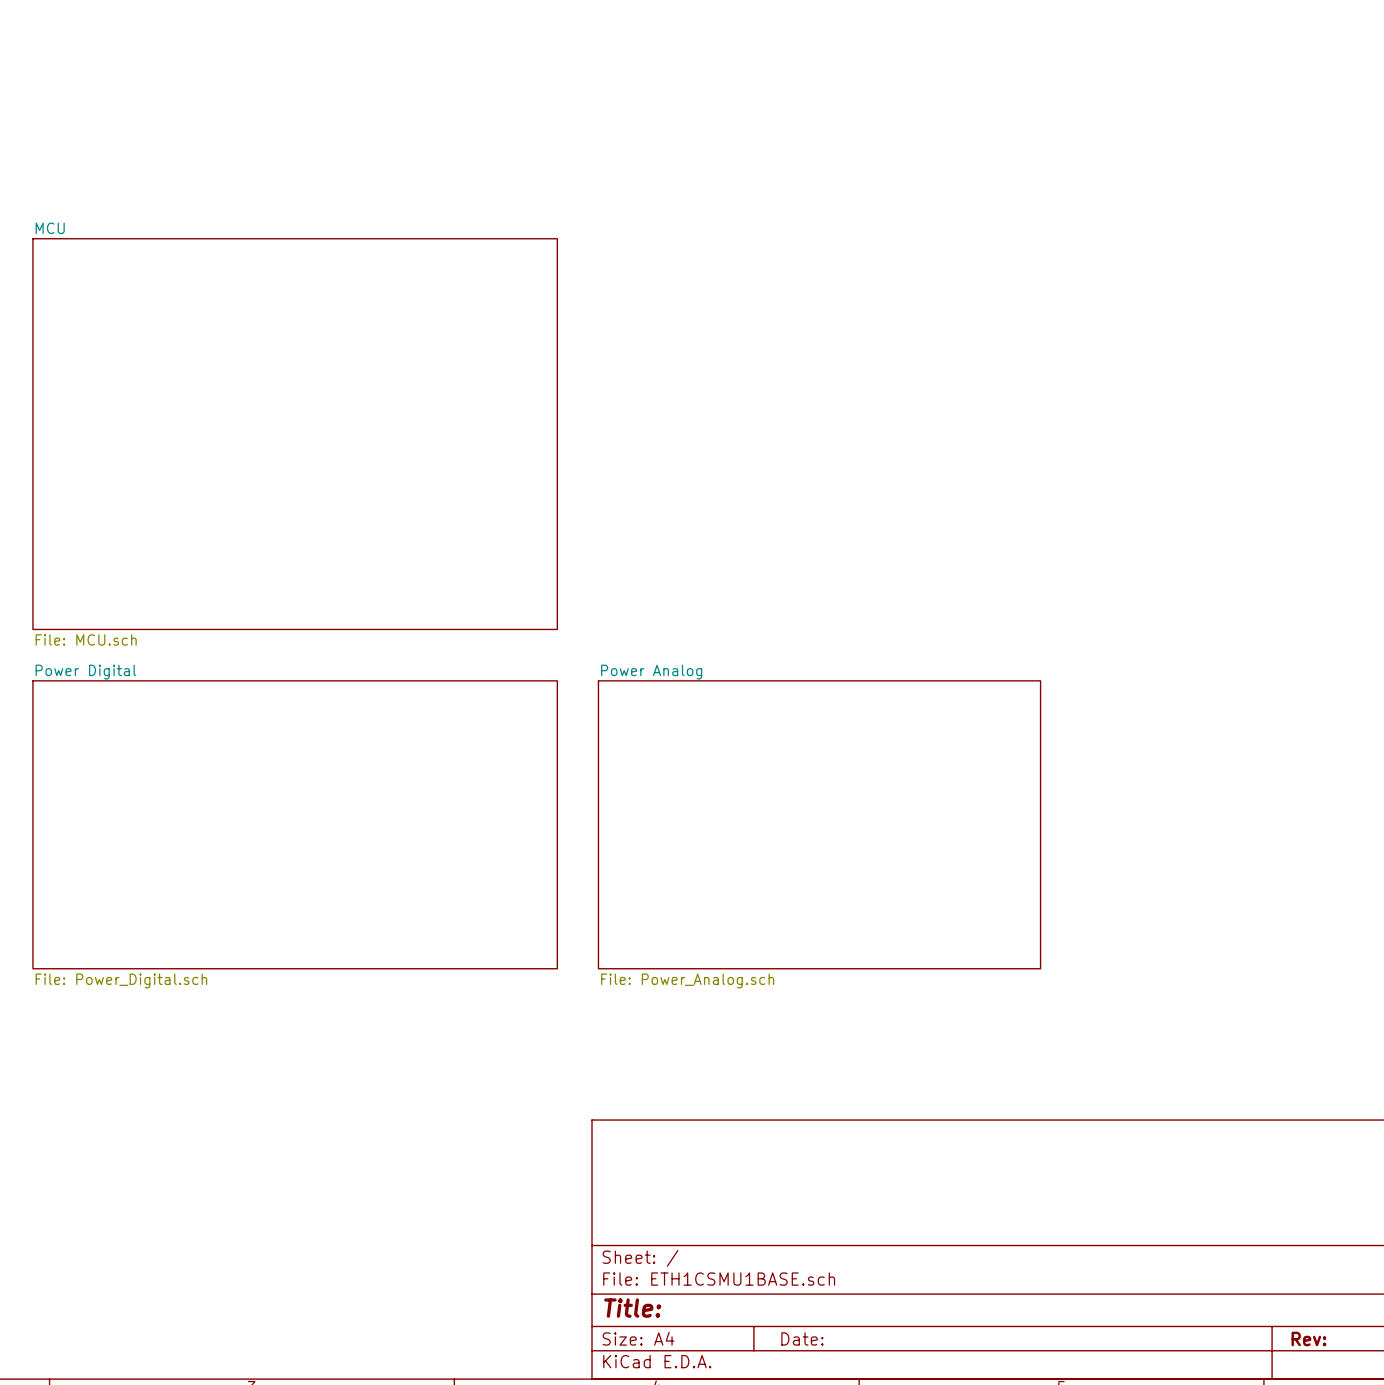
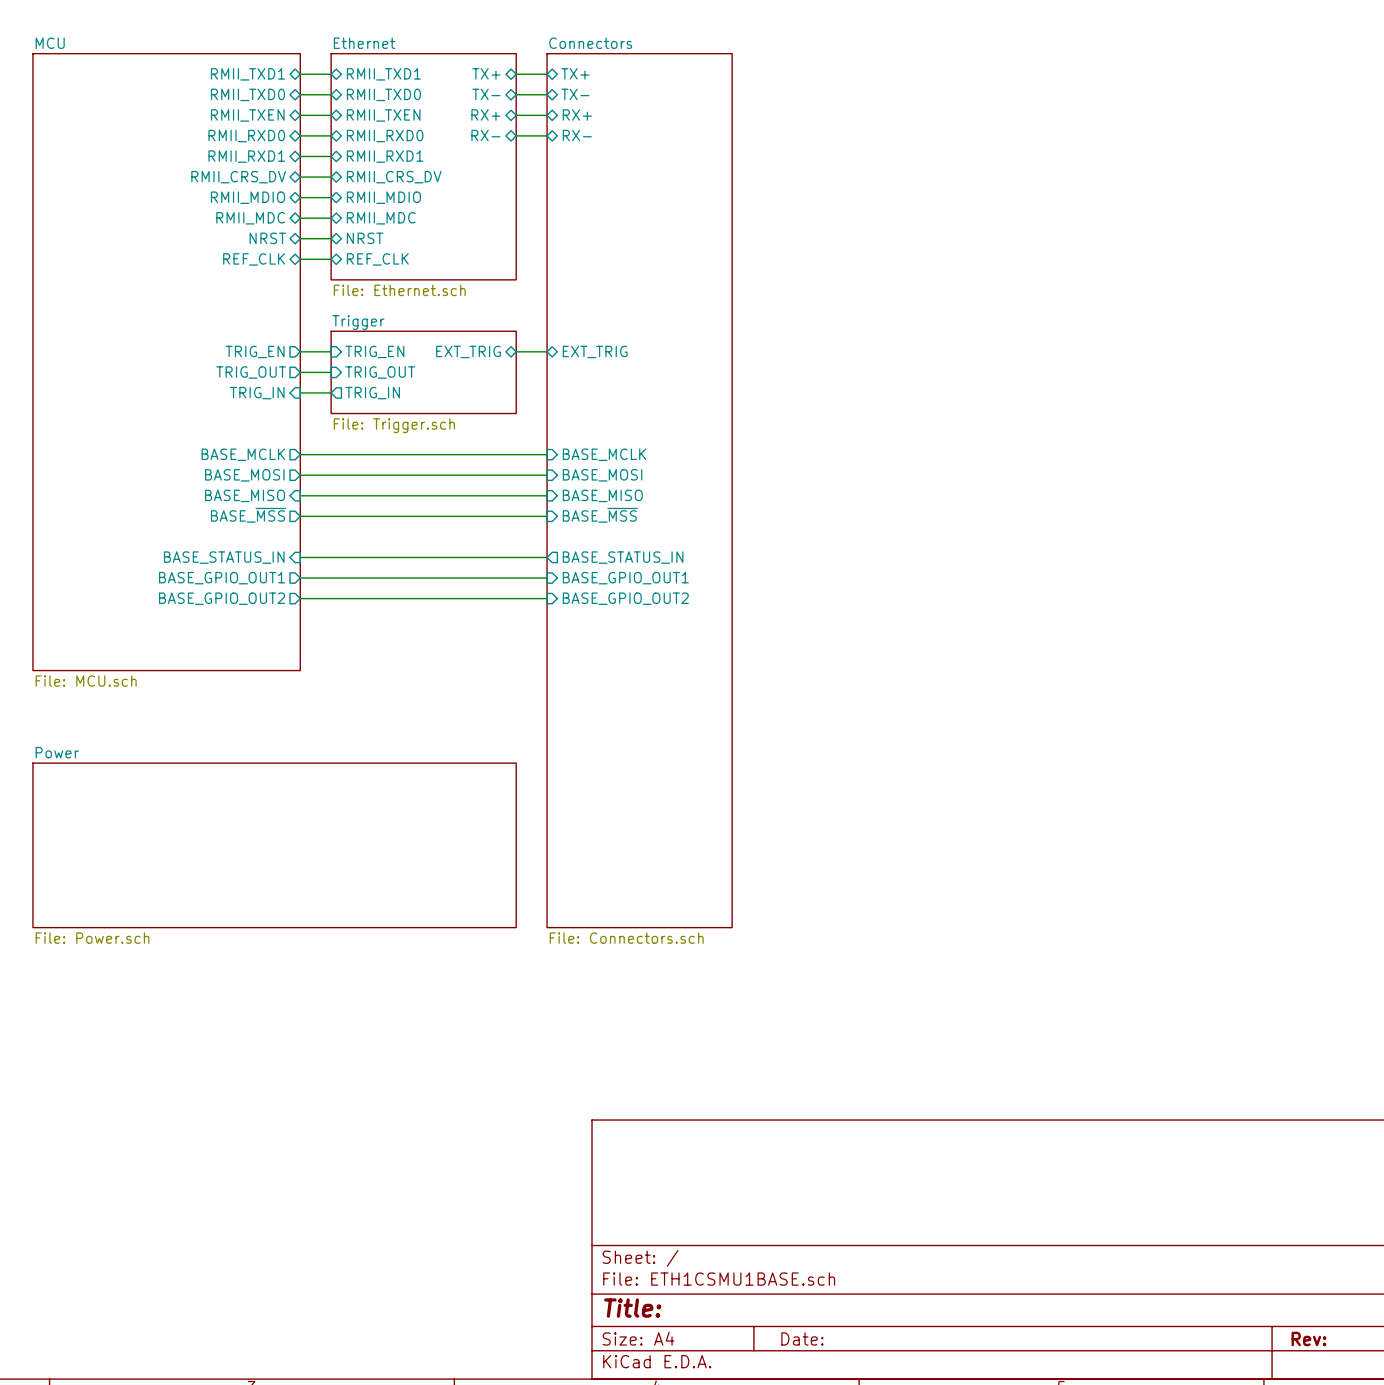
sheet pin: none -> TX+ (486, 73)
sheet pin: none -> TX+ (575, 73)
sheet pin: none -> RMII_TXD1 (247, 74)
wire: none -> (300, 74) (331, 74)
sheet pin: none -> RMII_TXD1 (383, 74)
wire: none -> (516, 74) (547, 74)
sheet pin: none -> RMII_TXD0 (247, 94)
wire: none -> (300, 94) (331, 94)
sheet pin: none -> RMII_TXD0 (383, 94)
sheet pin: none -> TX- (486, 94)
wire: none -> (516, 94) (547, 94)
sheet pin: none -> TX- (575, 94)
sheet pin: none -> RX+ (485, 114)
sheet pin: none -> RX+ (577, 114)
sheet pin: none -> RMII_TXEN (247, 115)
wire: none -> (300, 115) (331, 115)
sheet pin: none -> RMII_TXEN (383, 115)
wire: none -> (516, 115) (547, 115)
wire: none -> (300, 135) (331, 135)
sheet pin: none -> RX- (485, 135)
wire: none -> (516, 135) (547, 135)
sheet pin: none -> RX- (577, 135)
sheet pin: none -> RMII_RXD0 (246, 136)
sheet pin: none -> RMII_RXD0 (385, 136)
sheet pin: none -> RMII_RXD1 (246, 156)
wire: none -> (300, 156) (331, 156)
sheet pin: none -> RMII_RXD1 (385, 156)
sheet Ethernet: none -> File: Ethernet.sch (423, 166)
sheet pin: none -> RMII_CRS_DV (238, 177)
wire: none -> (300, 177) (331, 177)
sheet pin: none -> RMII_CRS_DV (394, 177)
sheet pin: none -> RMII_MDIO (247, 197)
wire: none -> (300, 197) (331, 197)
sheet pin: none -> RMII_MDIO (383, 197)
sheet pin: none -> RMII_MDC (250, 218)
wire: none -> (300, 218) (331, 218)
sheet pin: none -> RMII_MDC (381, 218)
sheet pin: none -> NRST (267, 238)
sheet pin: none -> NRST (365, 238)
sheet pin: none -> REF_CLK (254, 259)
wire: none -> (300, 259) (331, 259)
sheet pin: none -> REF_CLK (377, 259)
sheet pin: none -> TRIG_EN (255, 351)
wire: none -> (300, 351) (331, 351)
sheet pin: none -> TRIG_EN (374, 351)
sheet pin: none -> EXT_TRIG (468, 351)
wire: none -> (516, 351) (547, 351)
sheet pin: none -> EXT_TRIG (595, 351)
sheet MCU: none -> File: MCU.sch (166, 362)
sheet pin: none -> TRIG_OUT (251, 372)
wire: none -> (300, 372) (331, 372)
sheet pin: none -> TRIG_OUT (380, 372)
sheet Trigger: none -> File: Trigger.sch (423, 372)
wire: none -> (300, 392) (331, 392)
sheet pin: none -> TRIG_IN (257, 393)
sheet pin: none -> TRIG_IN (372, 393)
sheet MCU: File: MCU.sch (295, 434) -> none
sheet pin: none -> BASE_MCLK (243, 454)
wire: none -> (300, 454) (547, 454)
sheet pin: none -> BASE_MCLK (604, 454)
sheet pin: none -> BASE_MOSI (244, 475)
wire: none -> (300, 475) (547, 475)
sheet pin: none -> BASE_MOSI (602, 475)
sheet Connectors: none -> File: Connectors.sch (639, 490)
sheet pin: none -> BASE_MISO (245, 495)
wire: none -> (300, 495) (547, 495)
sheet pin: none -> BASE_MISO (602, 495)
sheet pin: none -> BASE_~{MSS} (248, 515)
sheet pin: none -> BASE_~{MSS} (600, 515)
wire: none -> (300, 516) (547, 516)
sheet pin: none -> BASE_STATUS_IN (224, 557)
wire: none -> (300, 557) (547, 557)
sheet pin: none -> BASE_STATUS_IN (623, 557)
sheet pin: none -> BASE_GPIO_OUT1 (222, 578)
wire: none -> (300, 578) (547, 578)
sheet pin: none -> BASE_GPIO_OUT1 (625, 578)
sheet pin: none -> BASE_GPIO_OUT2 (222, 598)
wire: none -> (300, 598) (547, 598)
sheet pin: none -> BASE_GPIO_OUT2 (625, 598)
sheet Power Digital: File: Power_Digital.sch (295, 824) -> none
sheet Power Analog: File: Power_Analog.sch (819, 824) -> none
sheet Power: none -> File: Power.sch (274, 845)

